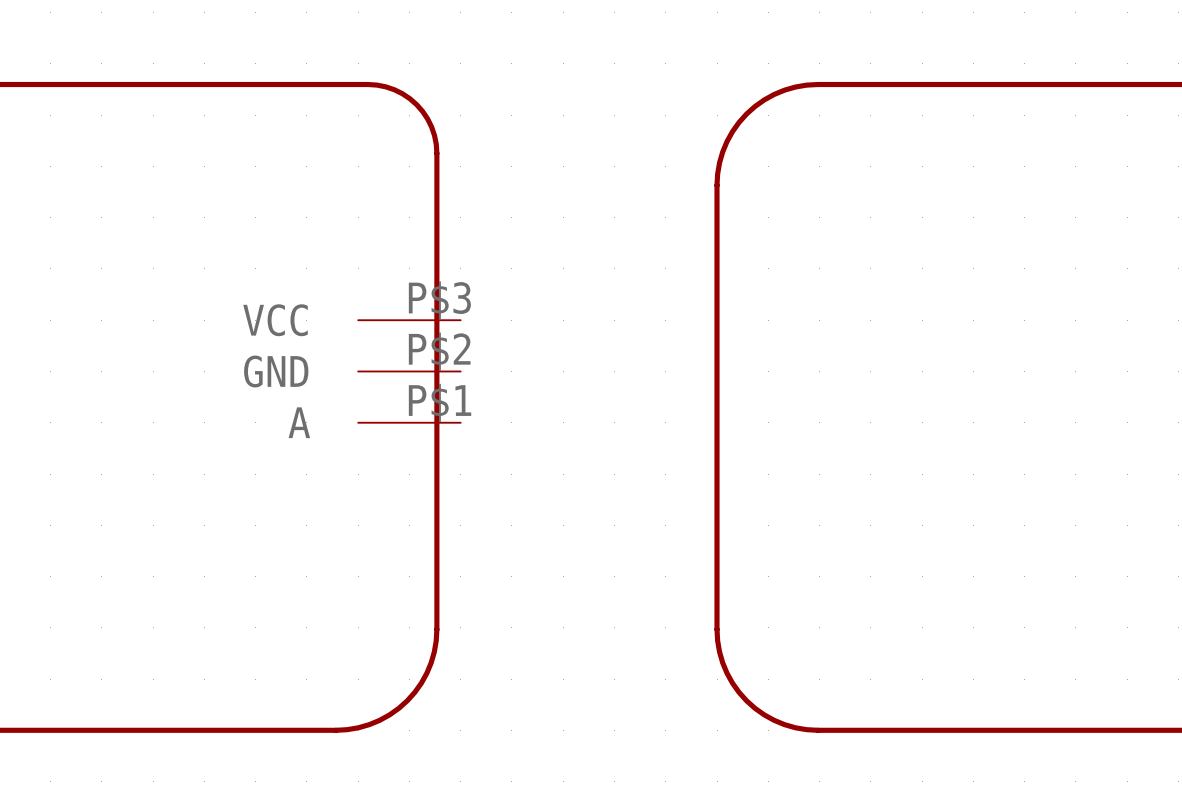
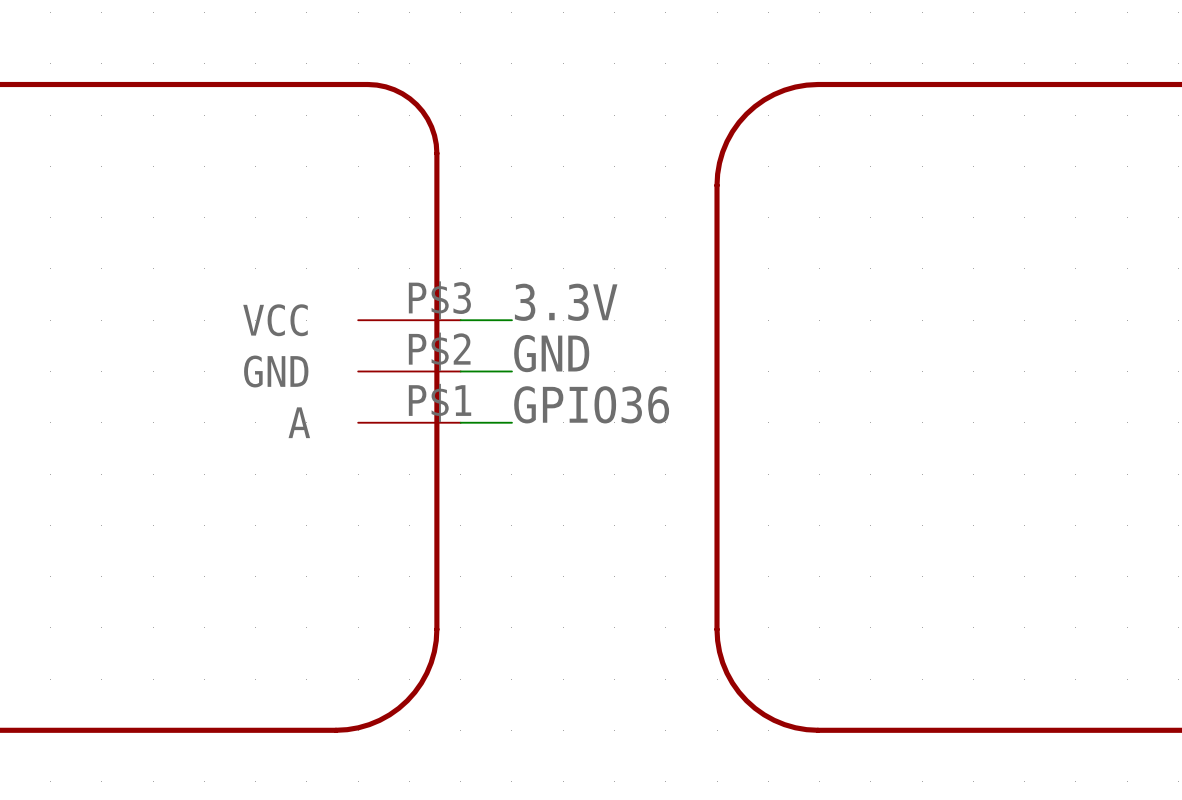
label: none -> 3.3V (566, 302)
wire: none -> (460, 320) (511, 320)
label: none -> GND (551, 353)
wire: none -> (460, 371) (511, 371)
label: none -> GPIO36 (591, 404)
wire: none -> (460, 422) (511, 422)

